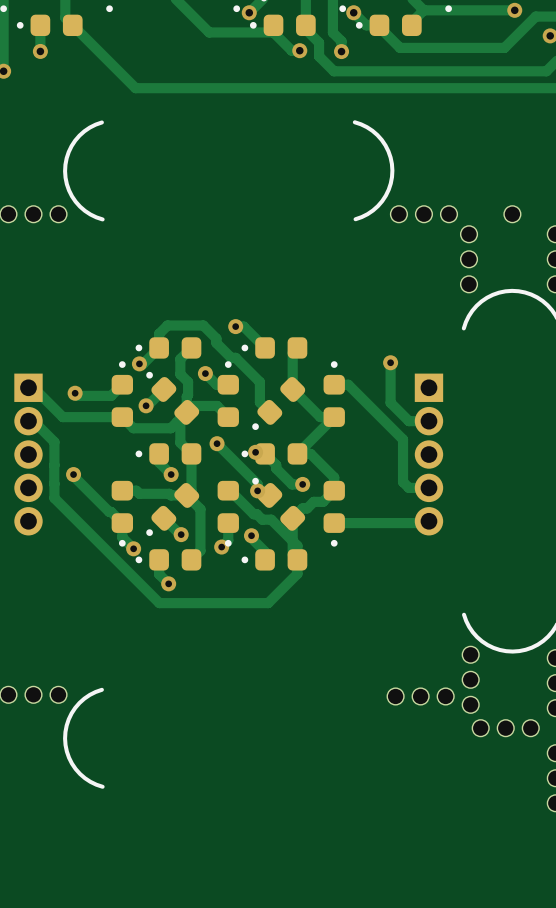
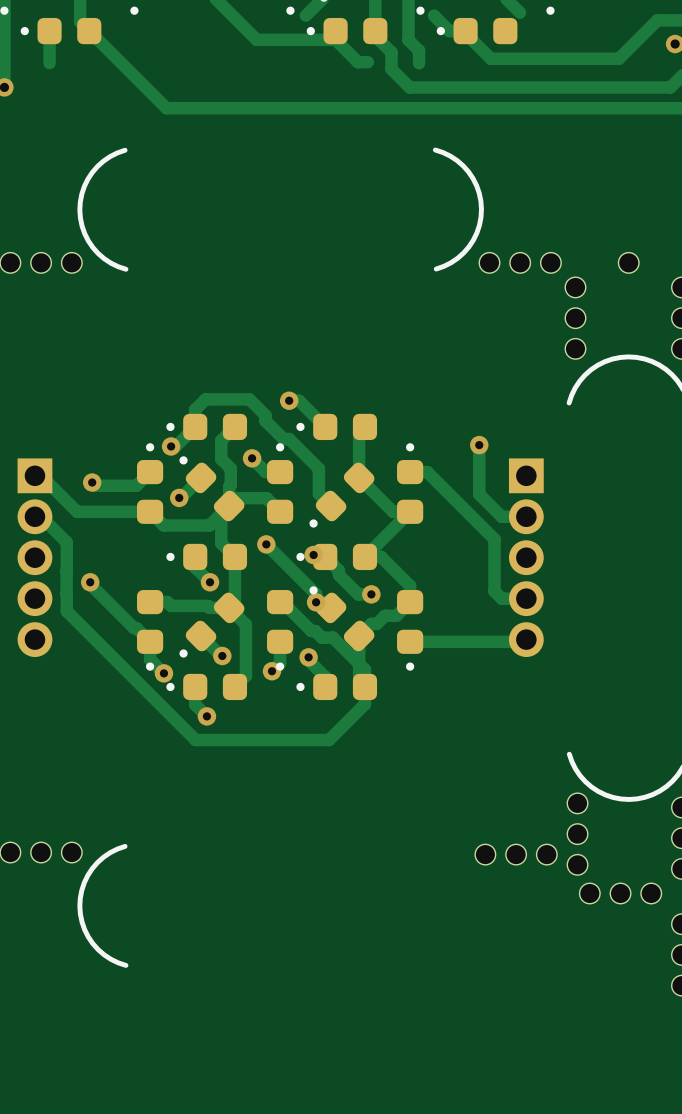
track: (514, 10) (423, 10) (411, 22) (411, 25) -> none
via: (514, 10) -> none
via: (249, 12) -> none
via: (353, 12) -> none
via: (299, 50) -> none
via: (40, 51) -> none
via: (341, 51) -> none

